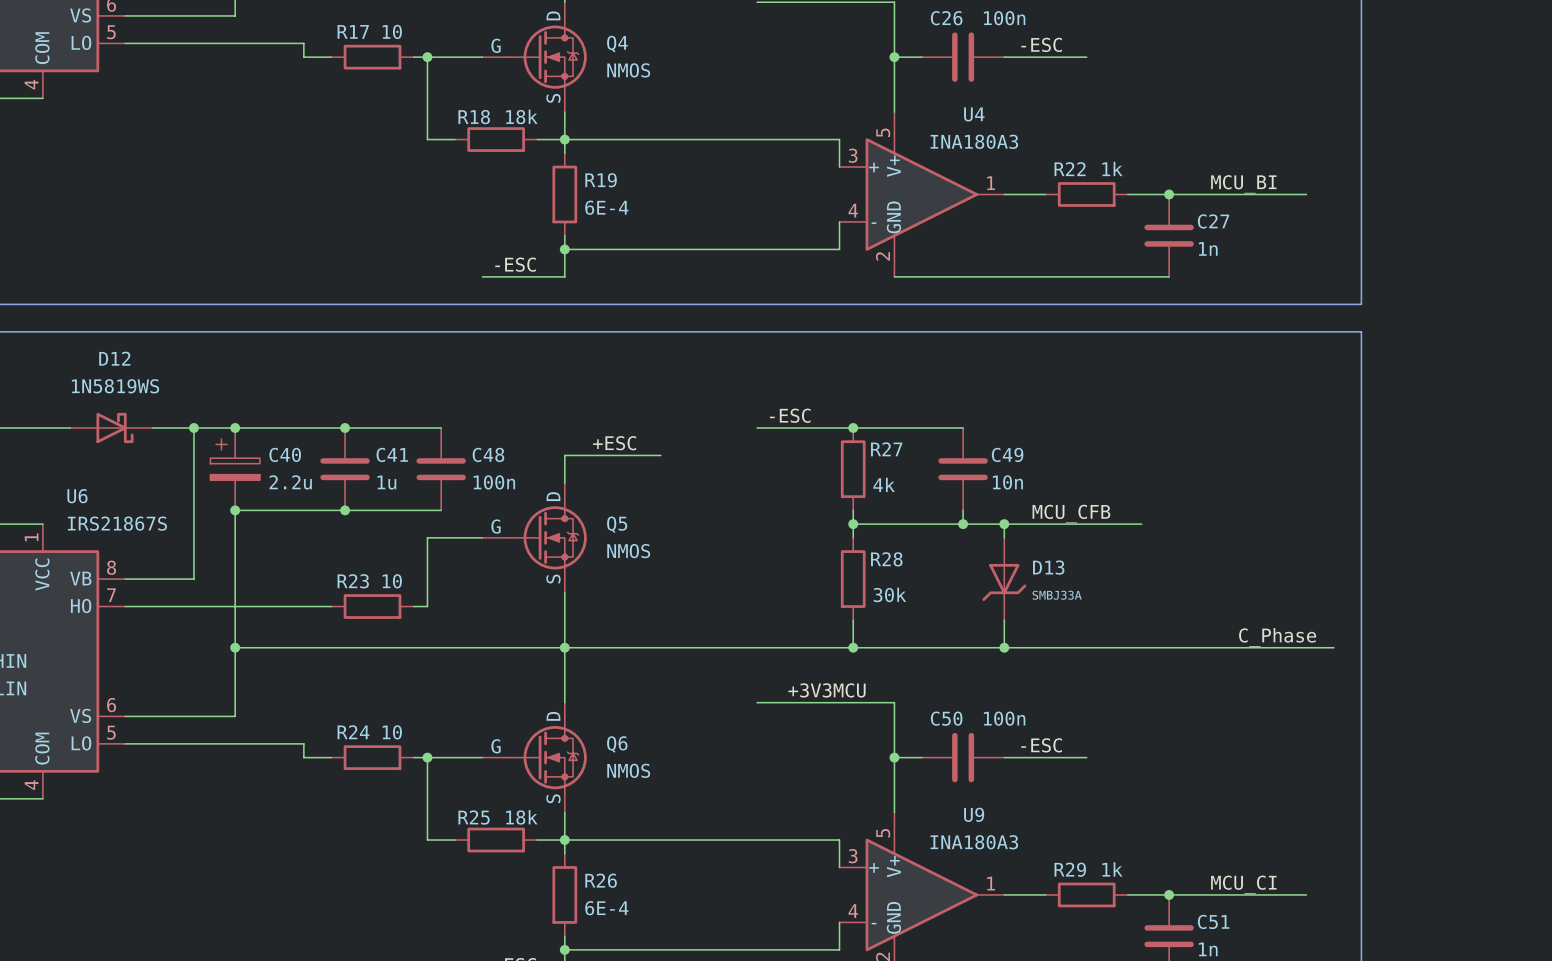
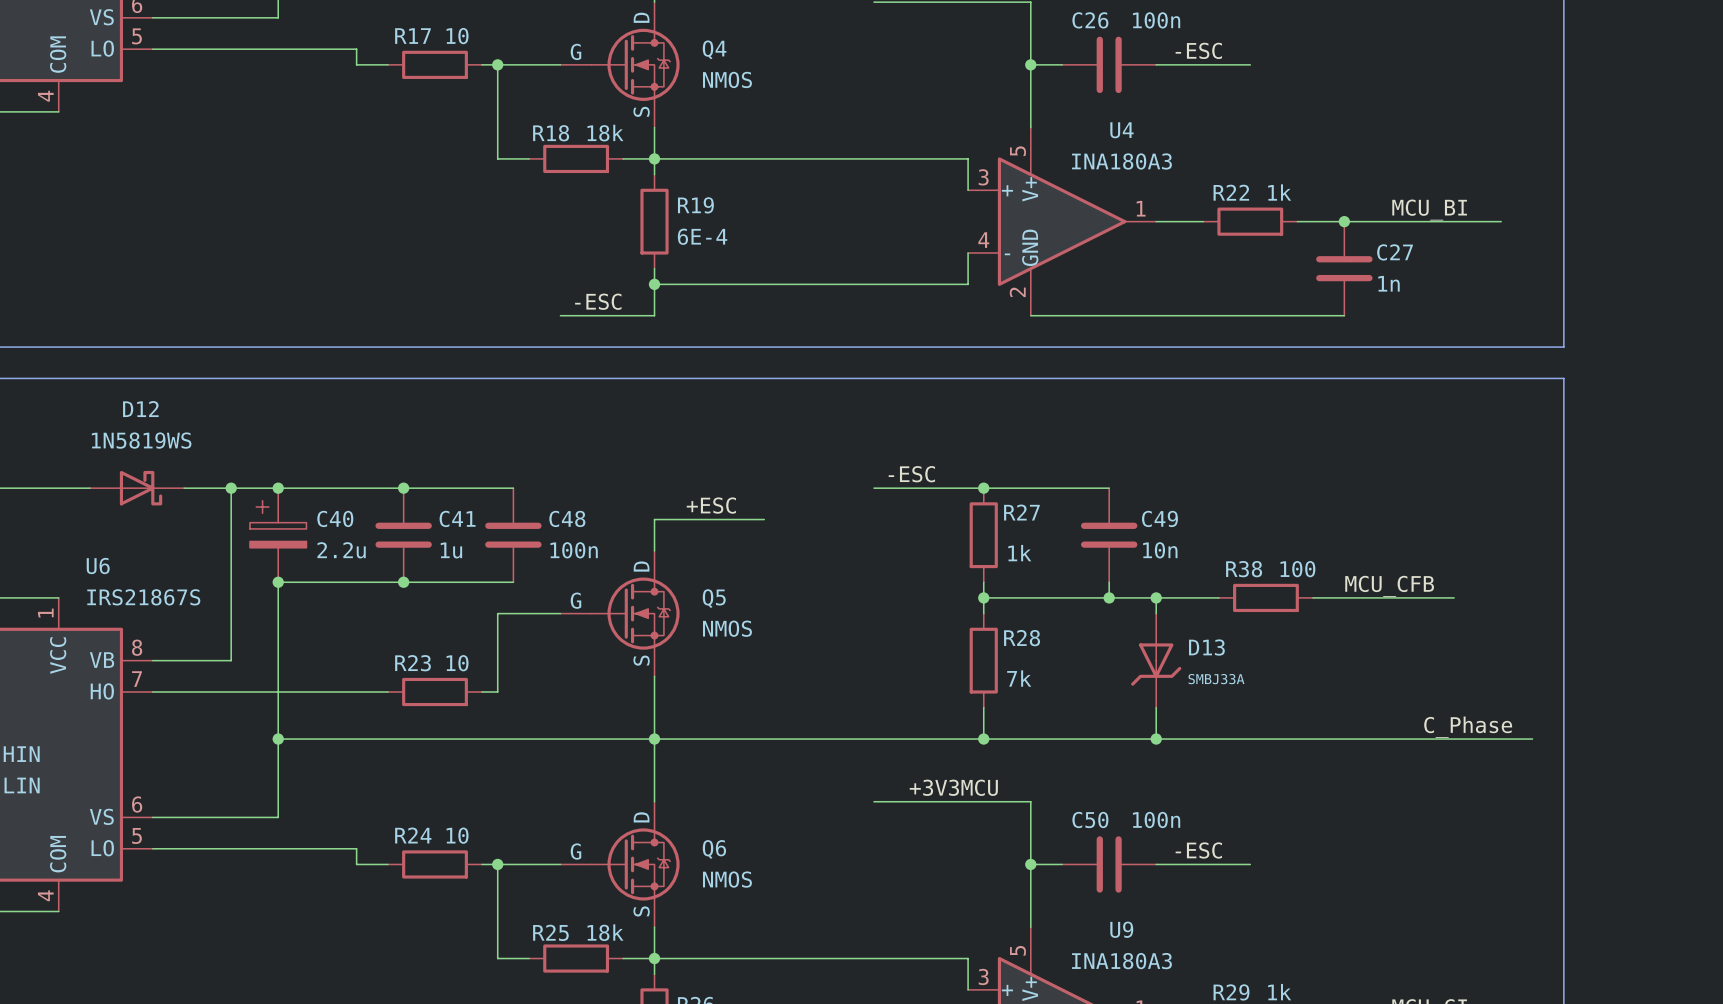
R27 value: 4k (884, 484) -> 1k (1019, 553)
label position: MCU_CFB (1071, 513) -> MCU_CFB (1389, 586)
wire: (1059, 524) (1141, 524) -> (1454, 597) (1313, 597)
R38: none -> 100 (1265, 597)
R28 value: 30k (889, 594) -> 7k (1019, 678)

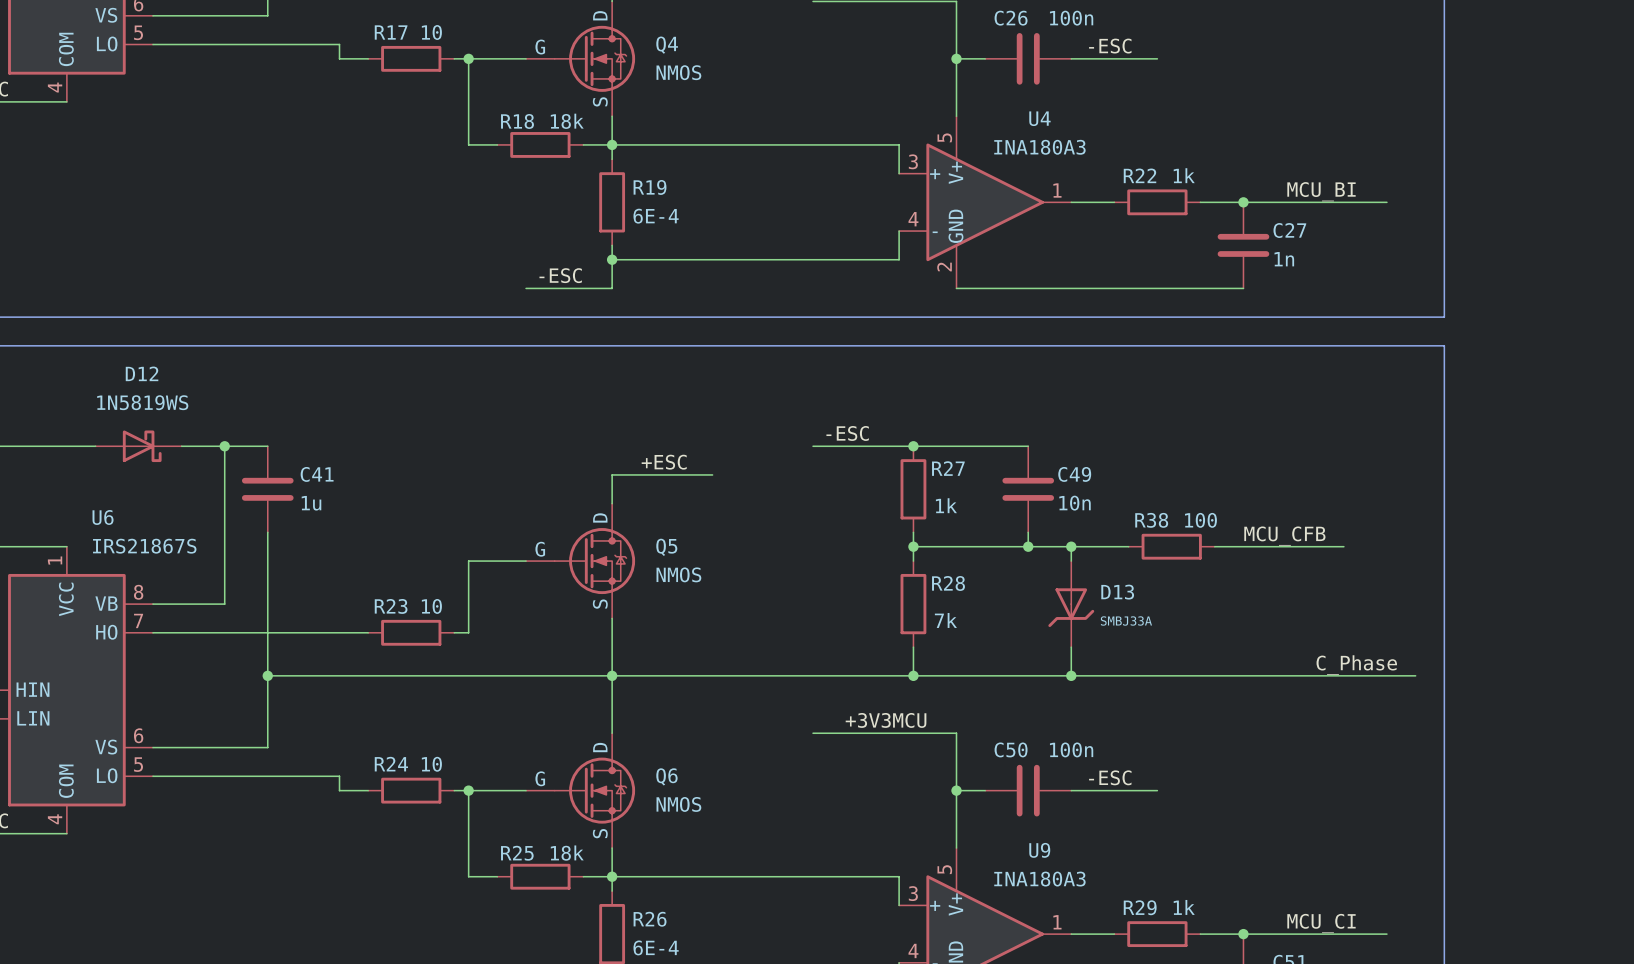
wire: (278, 488) (513, 488) -> none
junction: (278, 488) -> none
junction: (403, 488) -> none
C40: 2.2u (278, 535) -> none
C41 position: (403, 535) -> (267, 489)
C48: 100n (513, 535) -> none
wire: (278, 582) (513, 582) -> none
junction: (278, 582) -> none
junction: (403, 582) -> none

